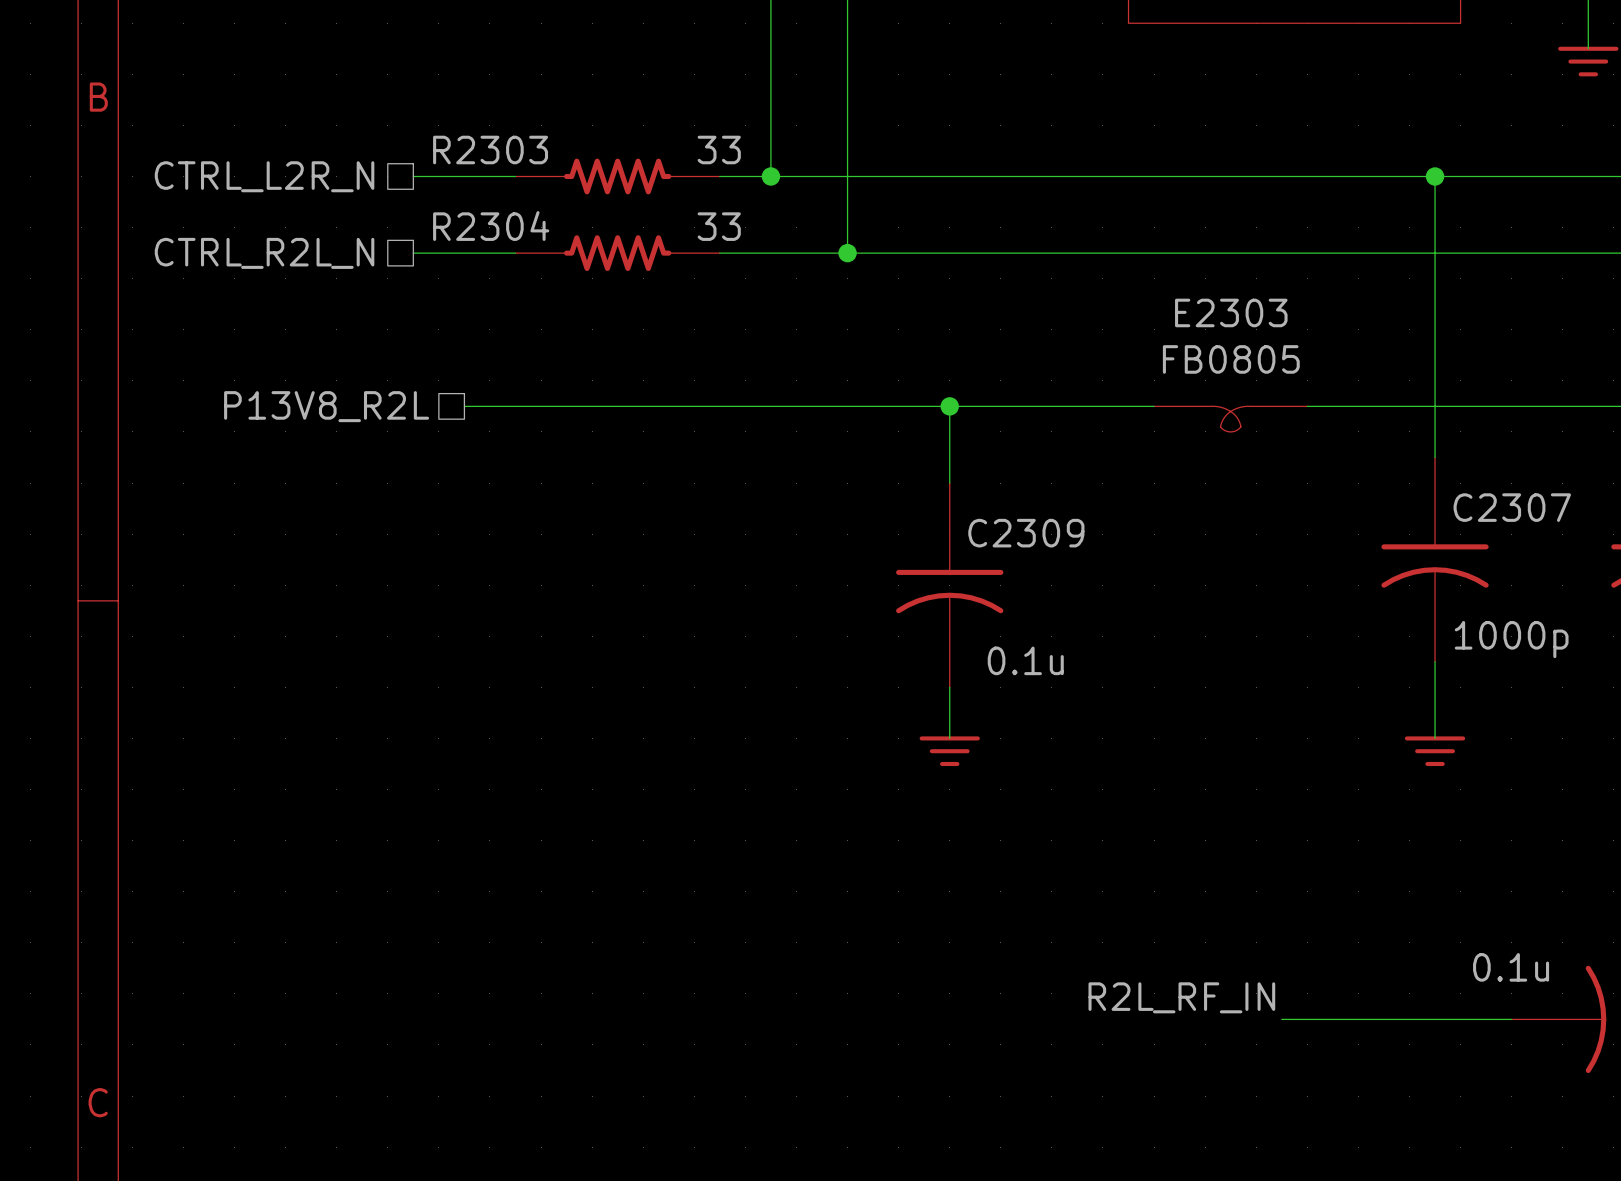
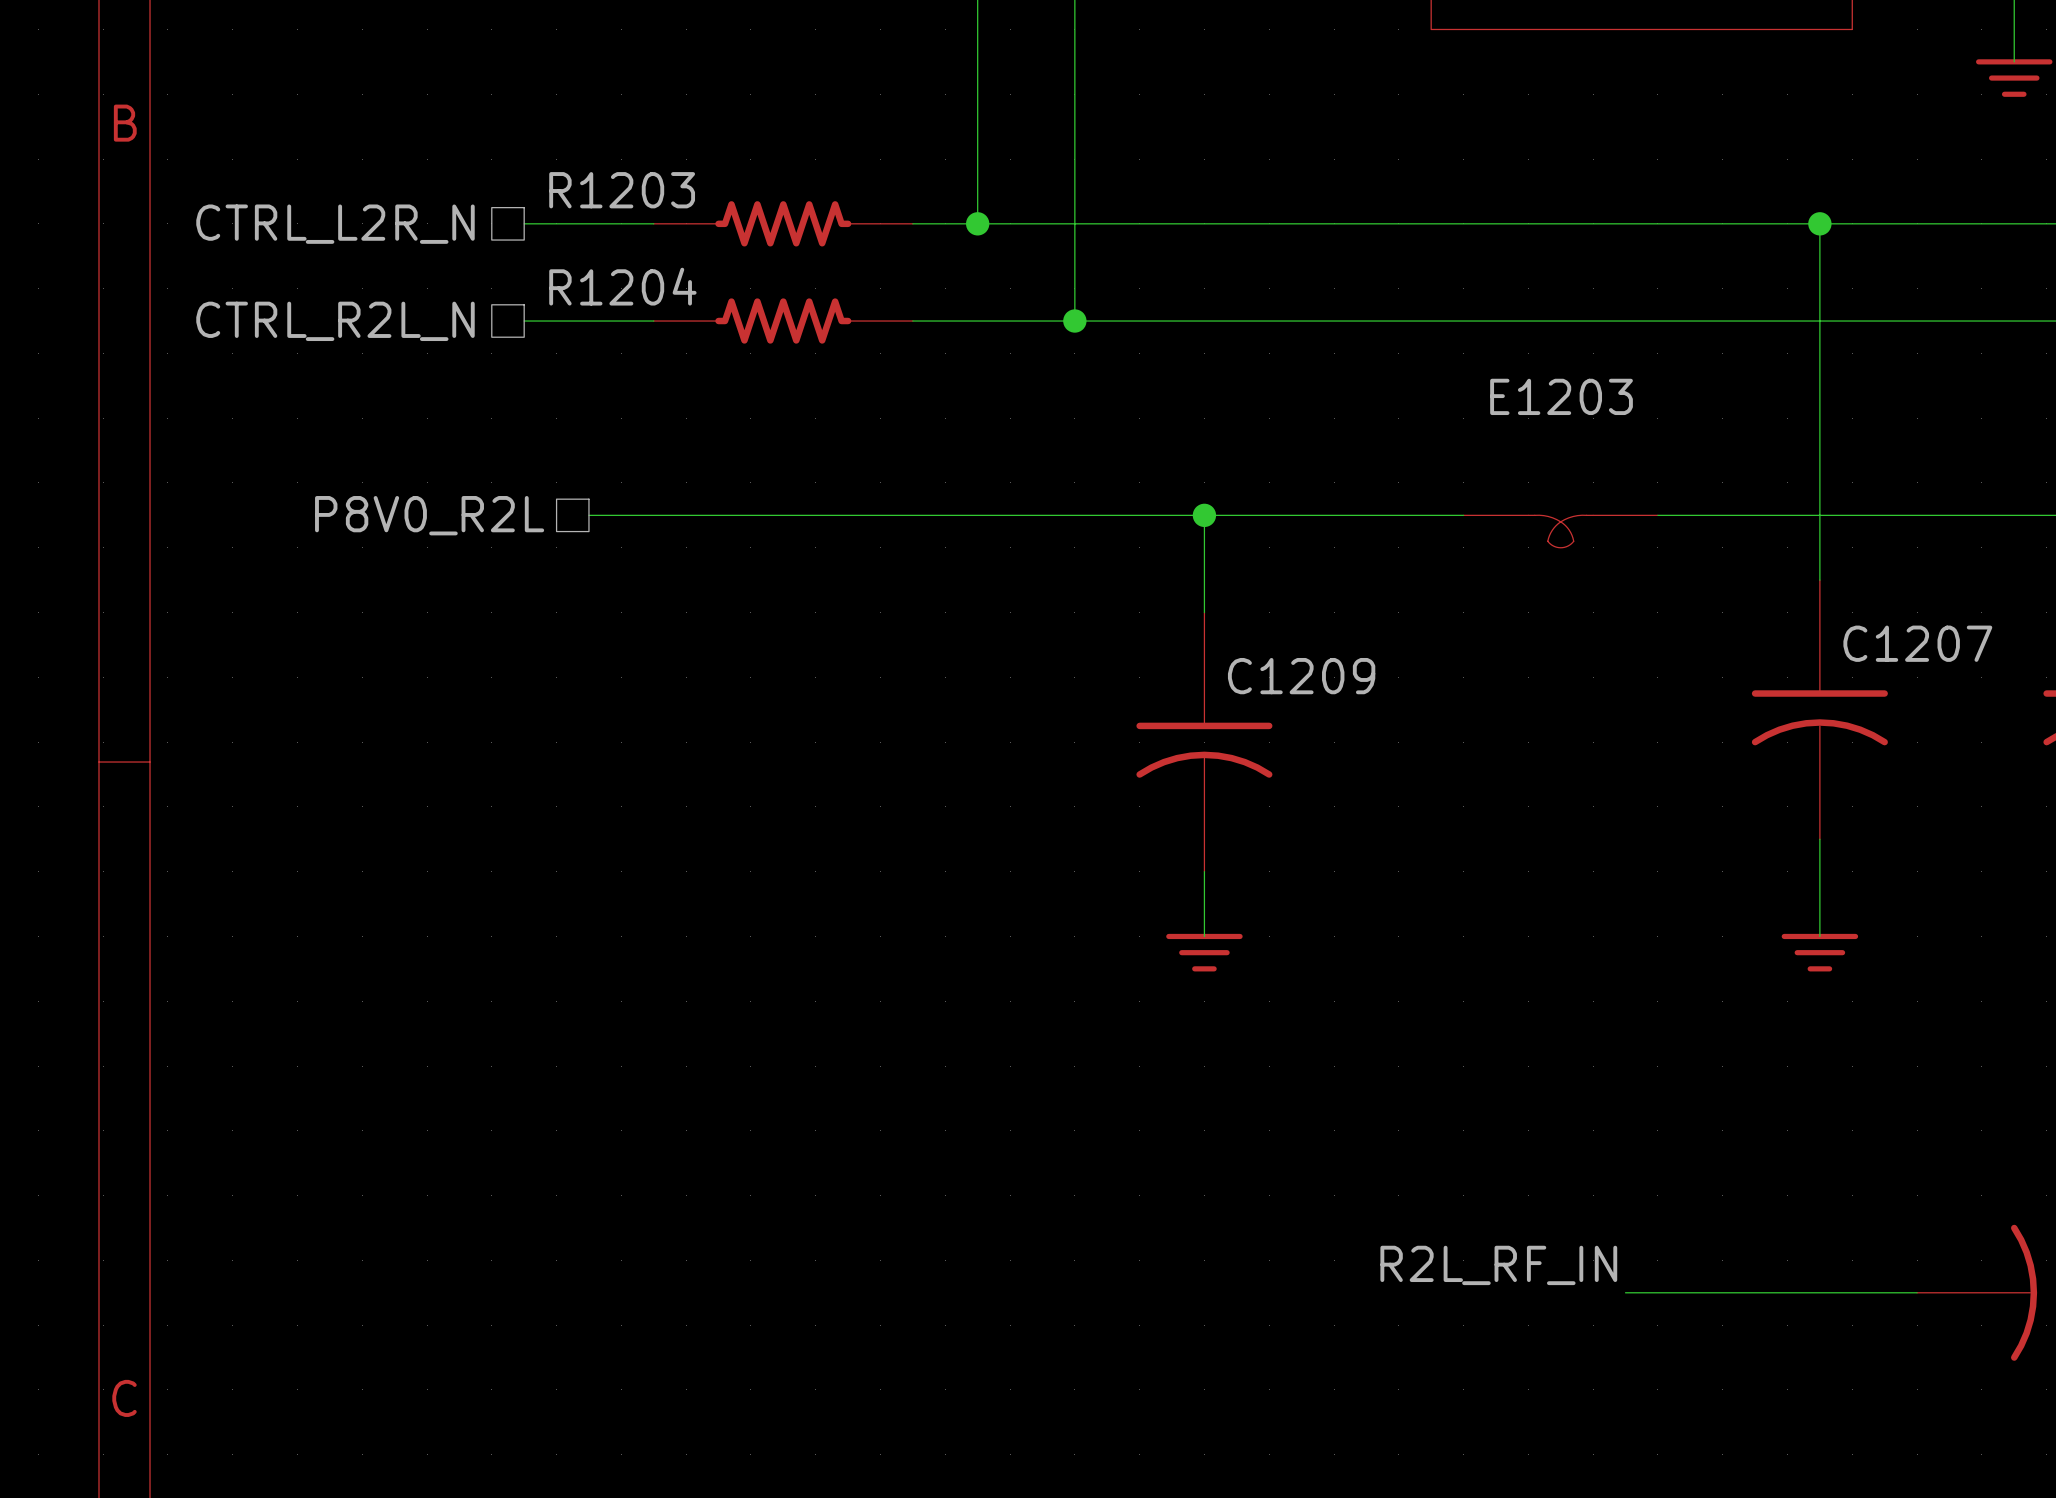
R2303 name: R2303 (490, 150) -> R1203 (622, 190)
R2303 value: 33 (719, 150) -> none
R2304 name: R2304 (491, 226) -> R1204 (622, 286)
R2304 value: 33 (719, 226) -> none
E2303 name: E2303 (1231, 312) -> E1203 (1561, 396)
E2303 value: FB0805 (1231, 359) -> none
hierarchical label: P13V8_R2L (326, 406) -> P8V0_R2L (429, 515)
C2307 name: C2307 (1512, 507) -> C1207 (1917, 643)
C2309 name: C2309 (1026, 533) -> C1209 (1301, 676)
C2307 value: 1000p (1511, 639) -> none
C2309 value: 0.1u (1025, 660) -> none
part value: 0.1u (1511, 967) -> none

